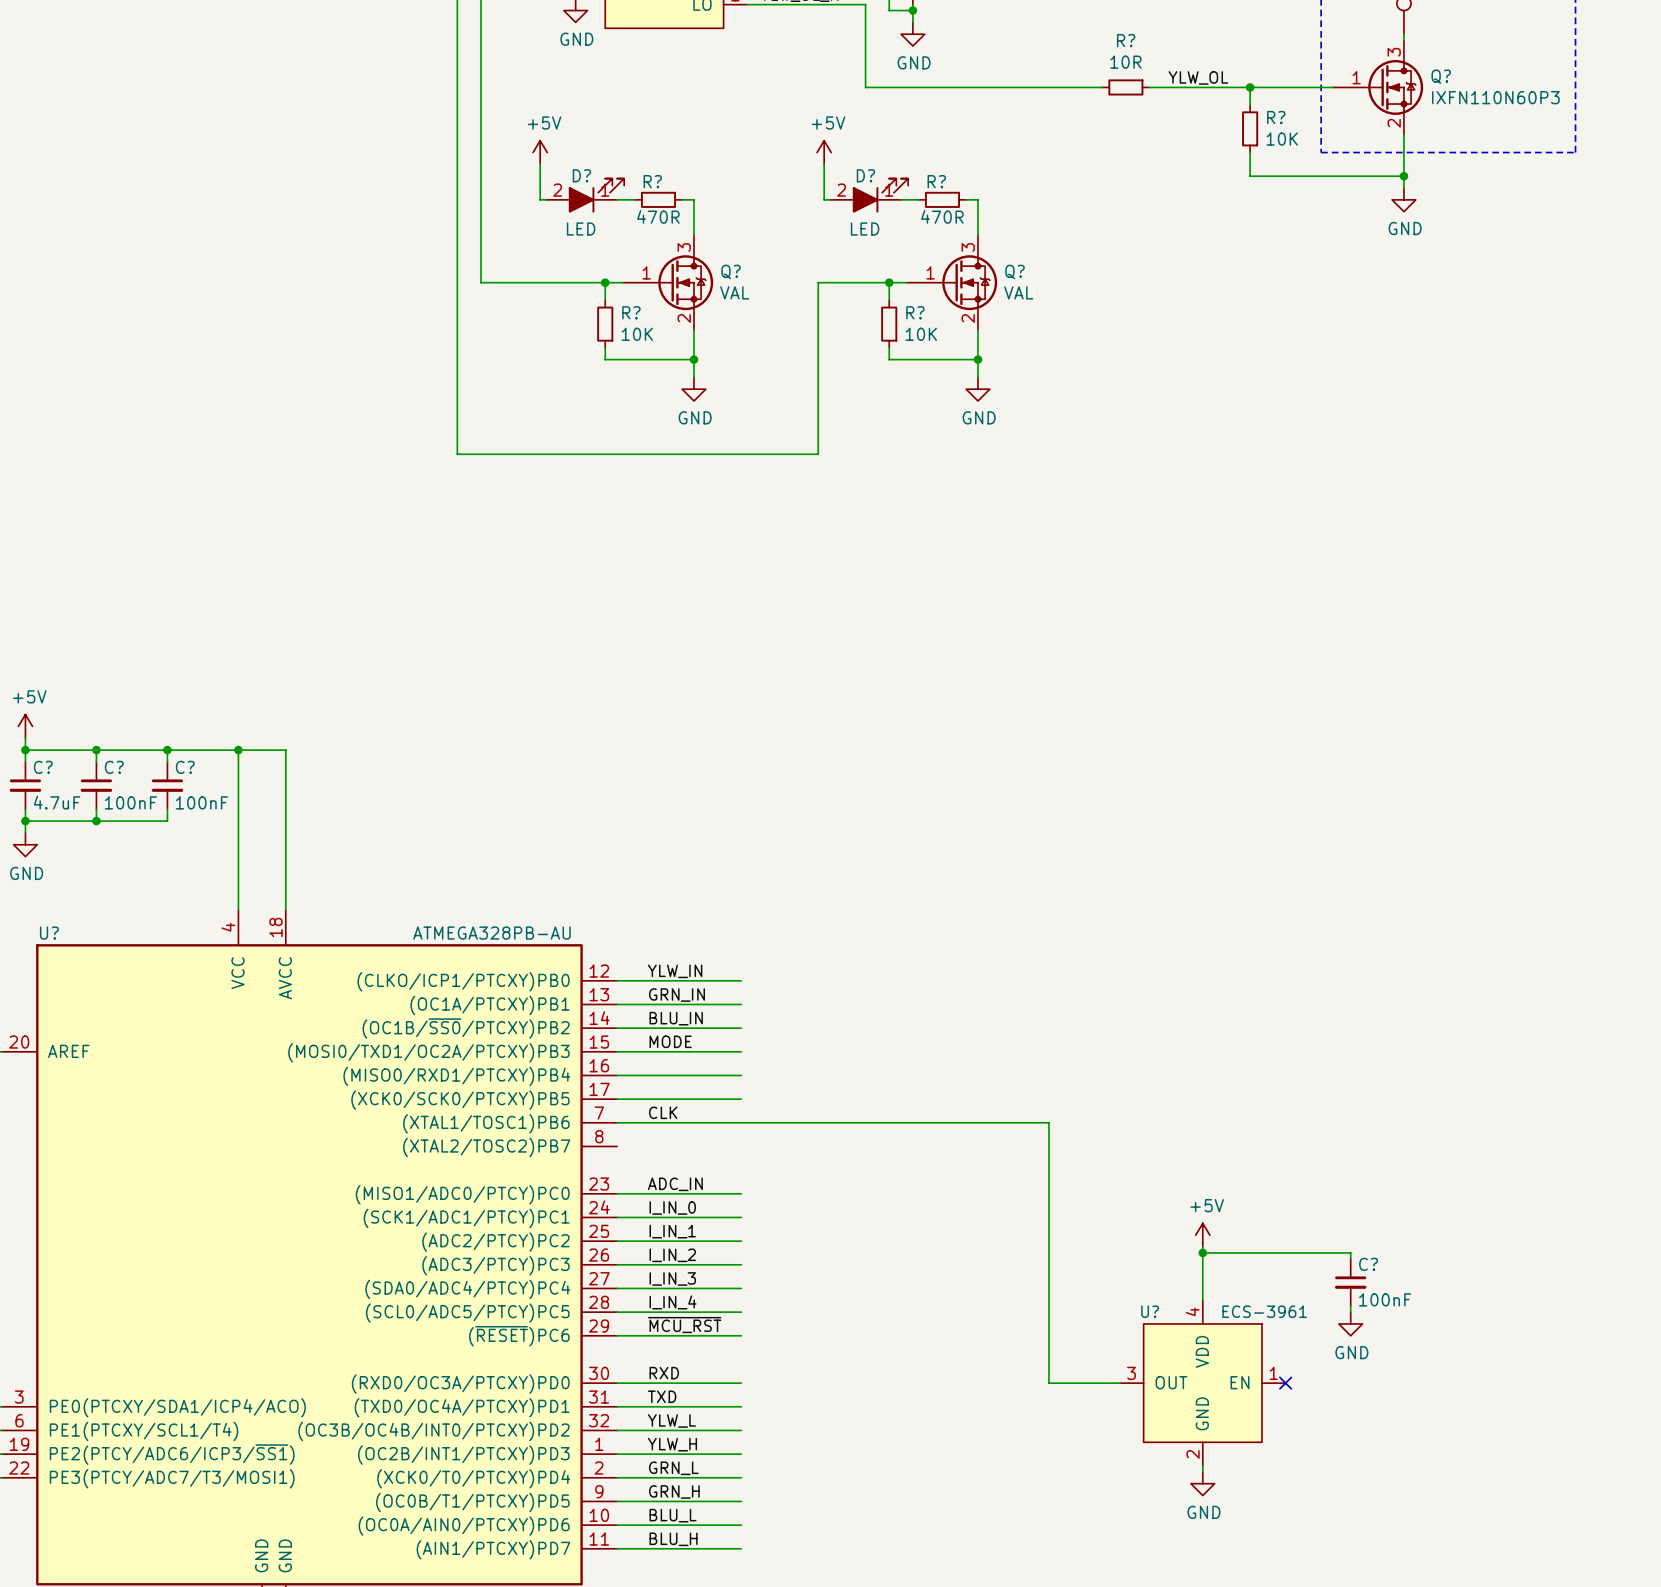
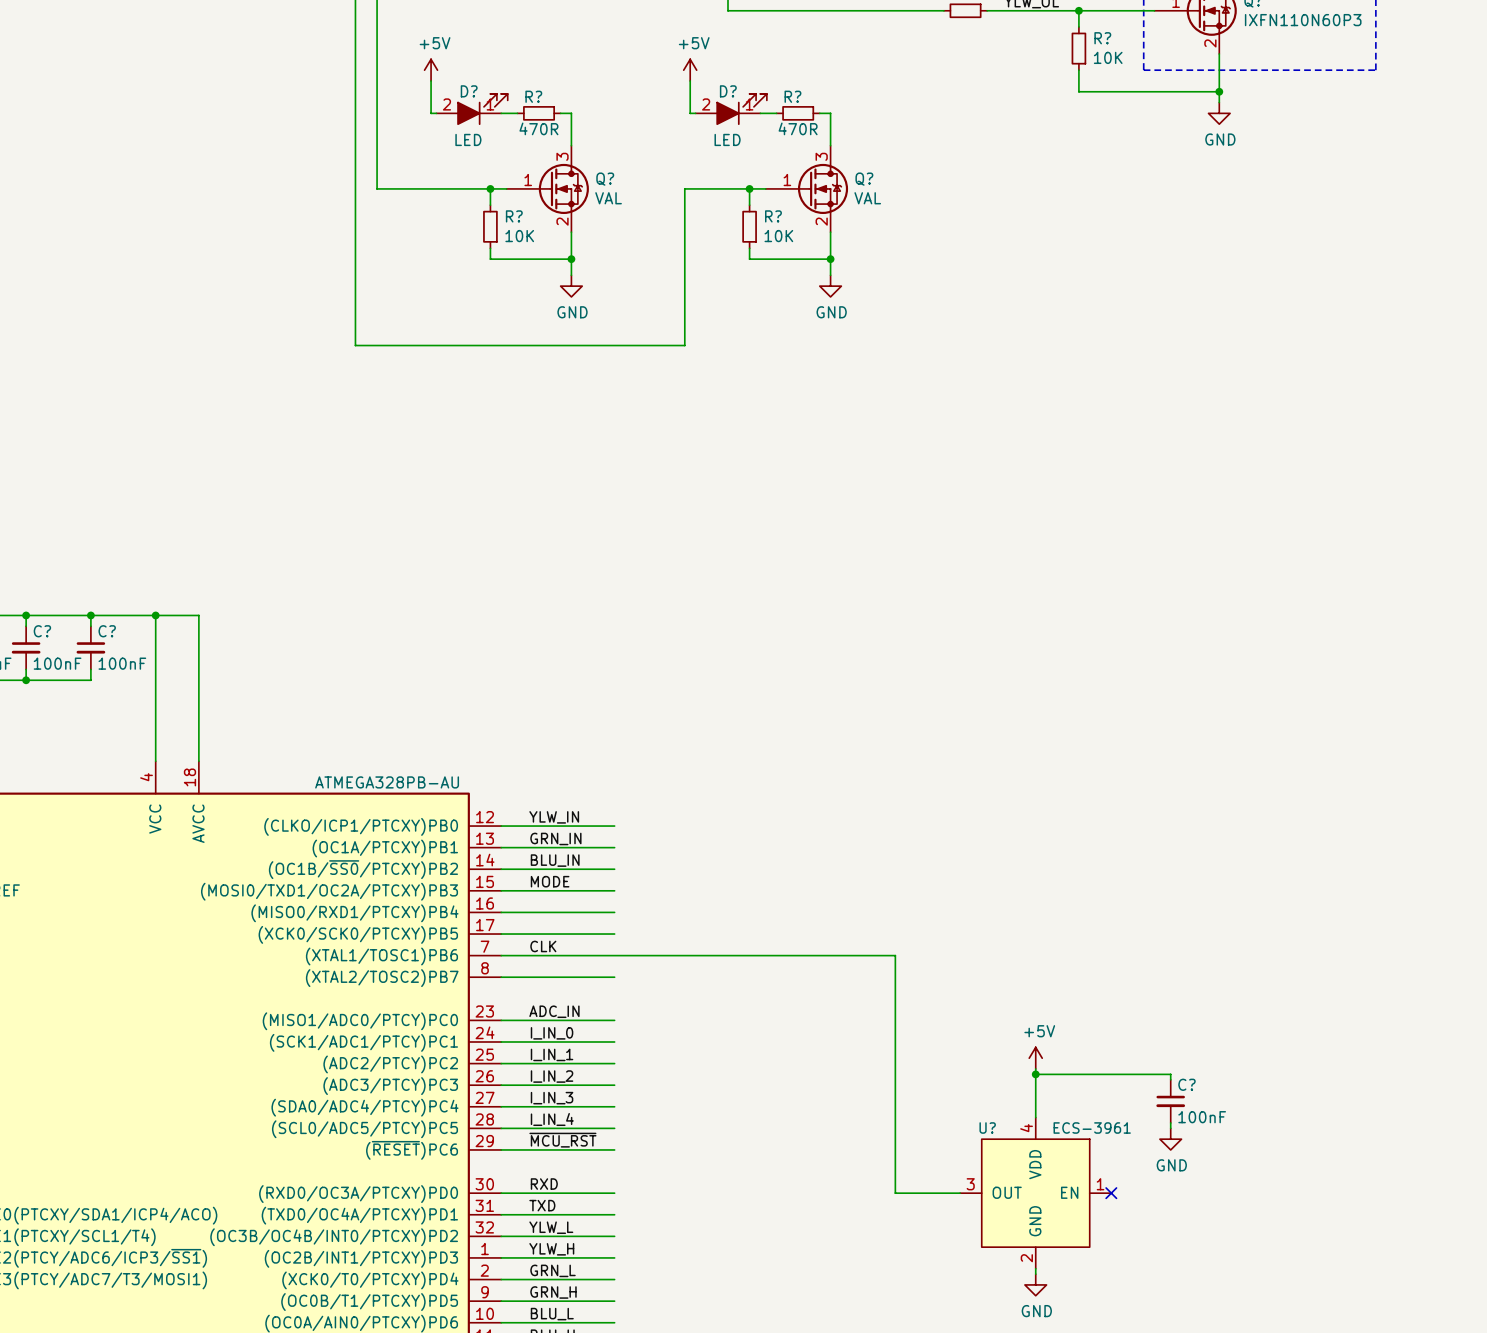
wire: none -> (501, 977) (614, 977)

